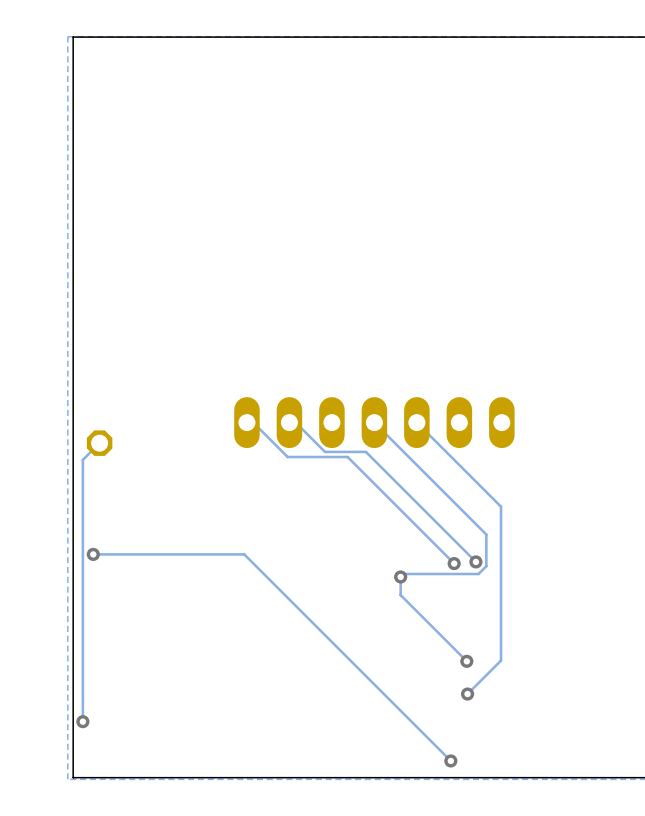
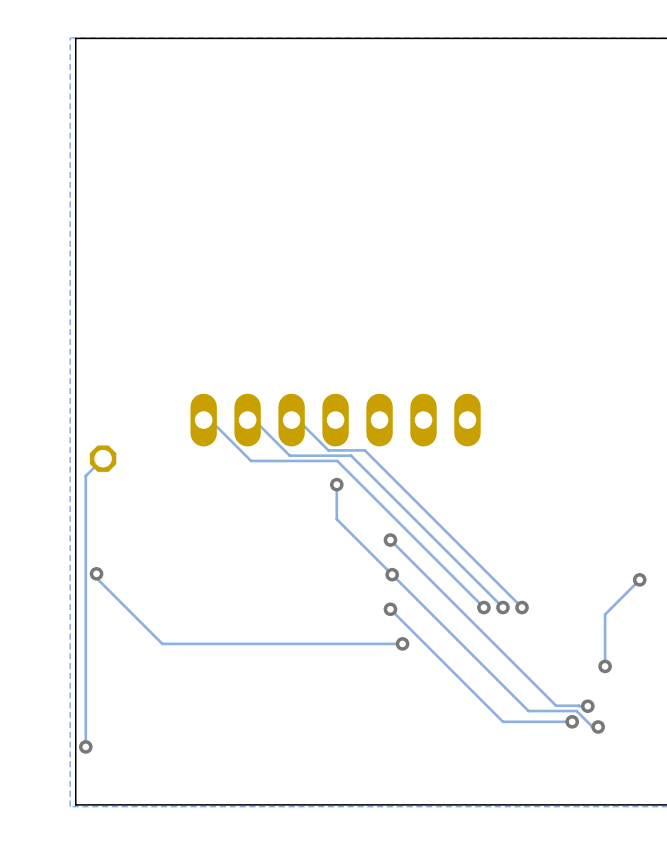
track: none -> (203, 420) (210, 420) (251, 460) (337, 460) (483, 607)
track: none -> (247, 420) (254, 420) (289, 455) (351, 455) (502, 607)
track: none -> (291, 420) (298, 420) (328, 450) (364, 450) (522, 607)
track: (246, 422) (253, 422) (287, 457) (347, 457) (454, 563) -> none
track: (289, 422) (295, 422) (325, 451) (365, 451) (475, 561) -> none
track: (374, 422) (486, 534) (486, 566) (478, 574) (403, 574) (400, 576) (400, 595) (466, 661) -> none
part position: (374, 422) -> (335, 420)
track: (416, 422) (501, 506) (501, 660) (467, 694) -> none
track: none -> (336, 484) (336, 519) (528, 711) (576, 711) (592, 726) (598, 726)
via: none -> (336, 484)
track: none -> (390, 540) (556, 705) (587, 706)
via: none -> (390, 540)
track: (93, 554) (244, 554) (450, 760) -> none
track: none -> (93, 574) (162, 643) (402, 643)
via: none -> (392, 574)
track: none -> (639, 579) (605, 614) (605, 666)
via: none -> (639, 579)
via: (475, 561) -> none
via: (454, 563) -> none
via: (400, 576) -> none
via: none -> (483, 607)
via: none -> (502, 607)
via: none -> (522, 607)
track: none -> (390, 609) (502, 721) (572, 721)
via: none -> (390, 609)
via: none -> (402, 643)
via: none -> (605, 666)
via: (466, 661) -> none
via: none -> (587, 706)
via: (467, 694) -> none
via: none -> (572, 721)
via: none -> (598, 726)
via: (450, 760) -> none

